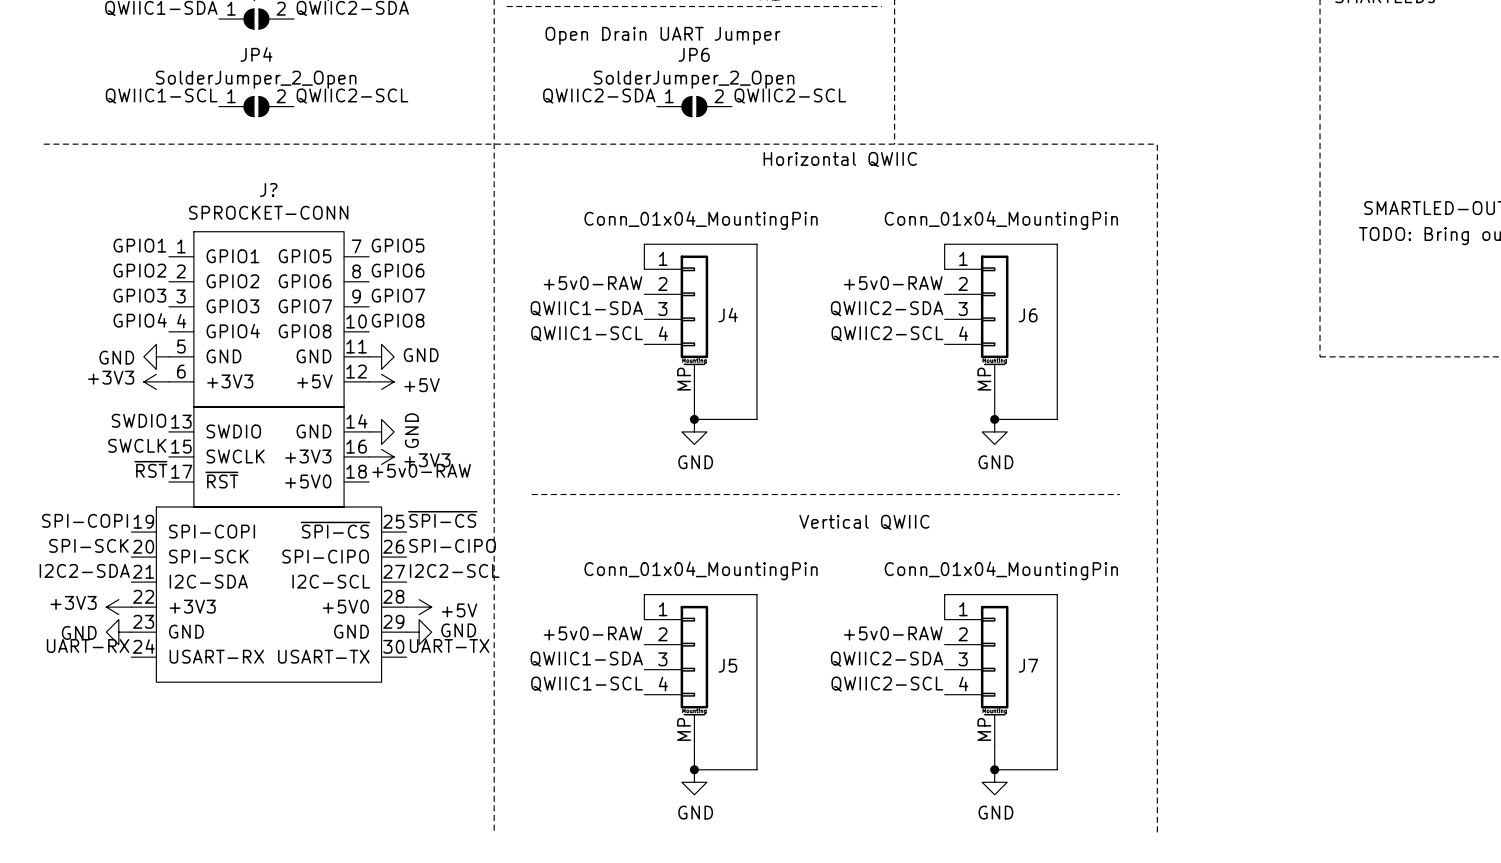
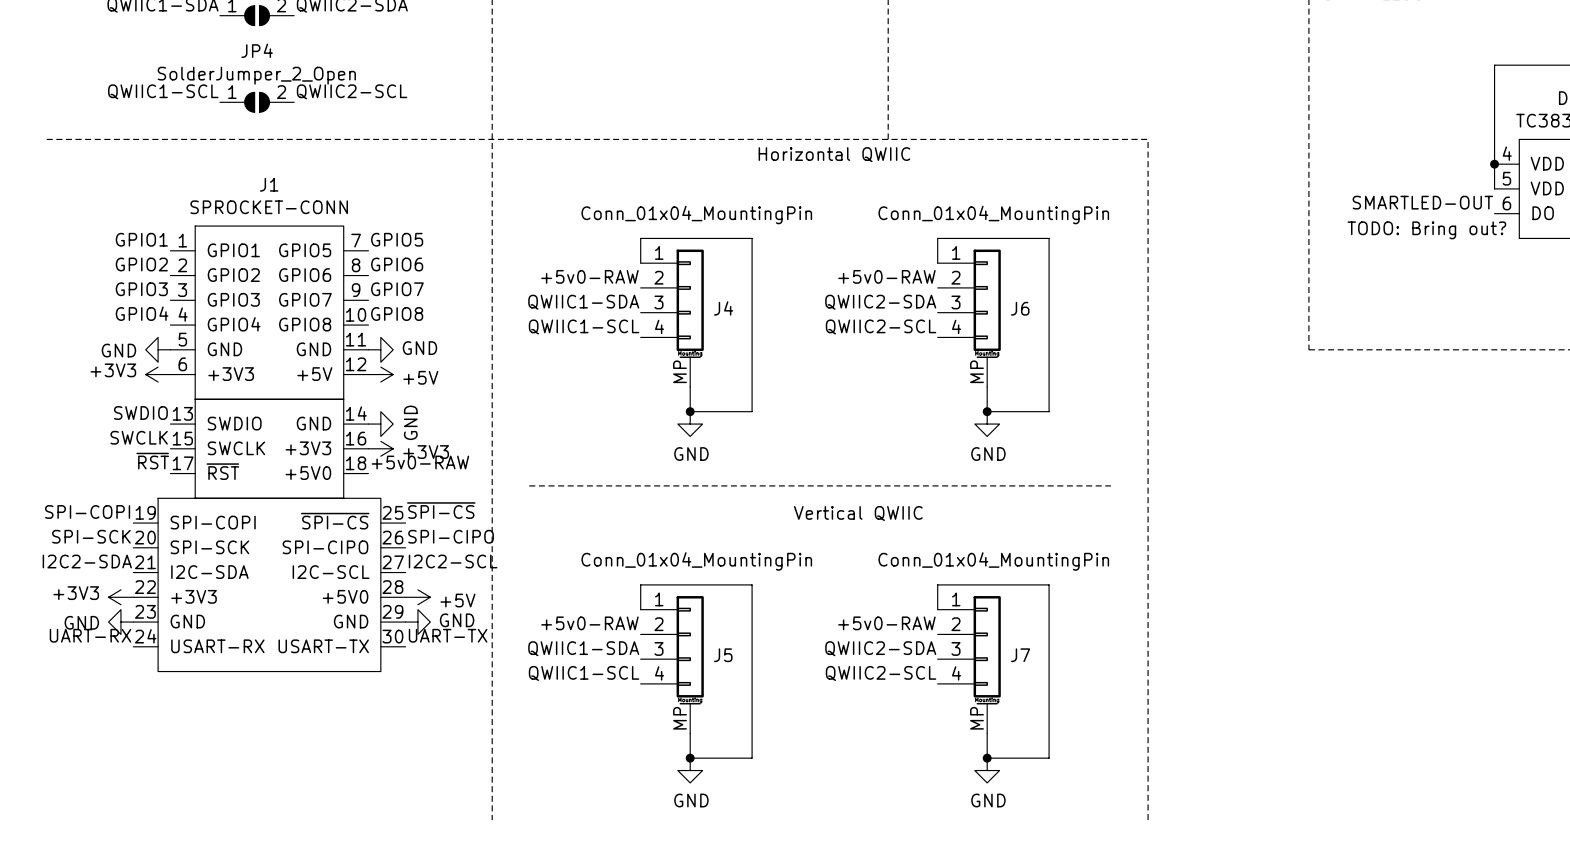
line: (506, 6) (882, 6) -> none
text: Open Drain UART Jumper (663, 35) -> none
label: QWIIC2-SDA (599, 96) -> none
label: QWIIC2-SCL (790, 96) -> none
JP6: SolderJumper_2_Open (694, 106) -> none
J? name: J? (268, 189) -> J1 (269, 184)

